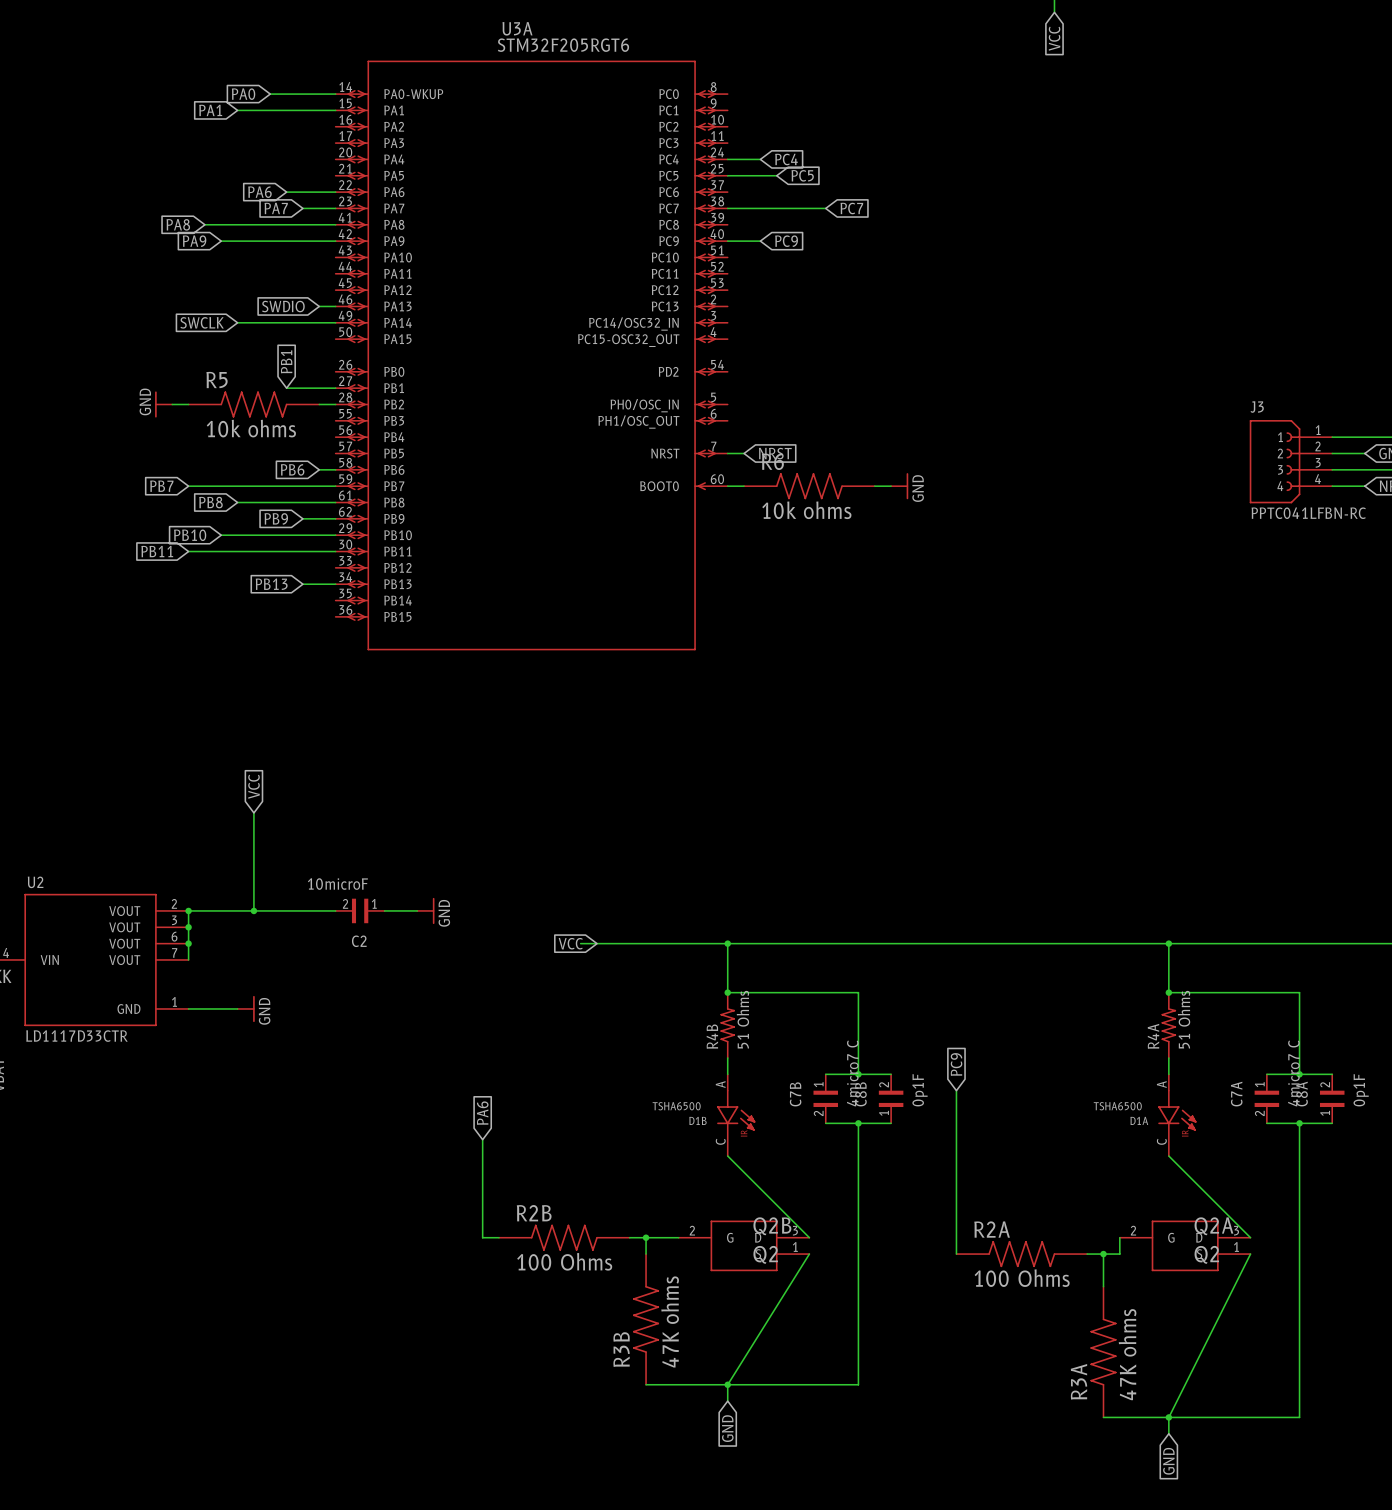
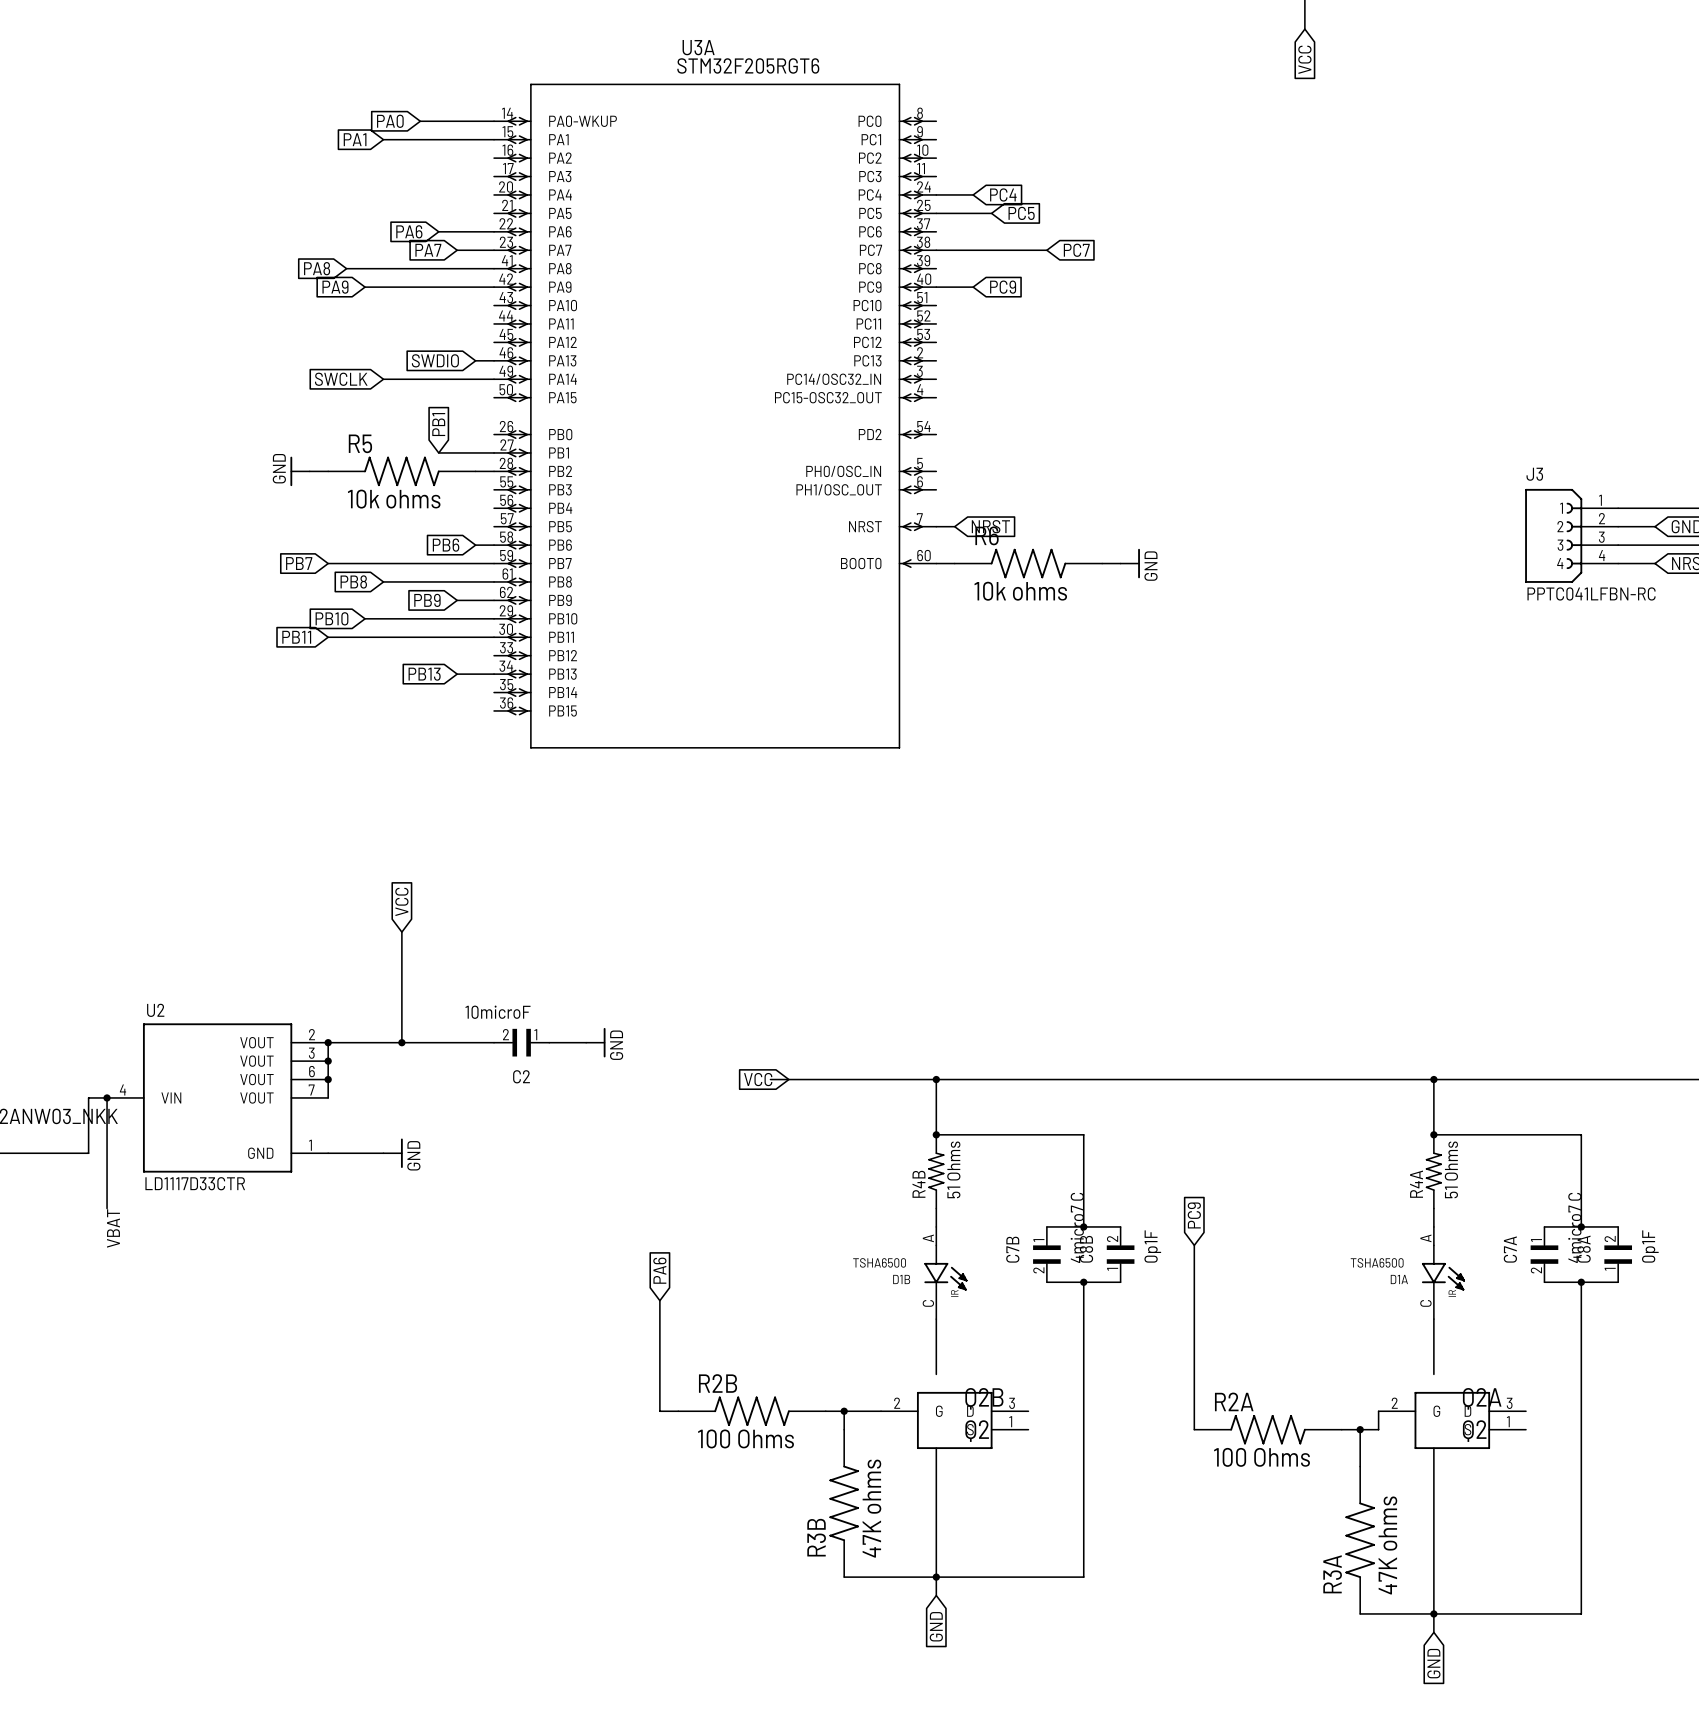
wire: (727, 1156) (809, 1237) -> (936, 1319) (936, 1374)
wire: (1168, 1156) (1250, 1237) -> (1433, 1319) (1433, 1374)
wire: (809, 1254) (727, 1384) -> (936, 1448) (936, 1577)
wire: (1250, 1254) (1168, 1417) -> (1433, 1448) (1433, 1613)

